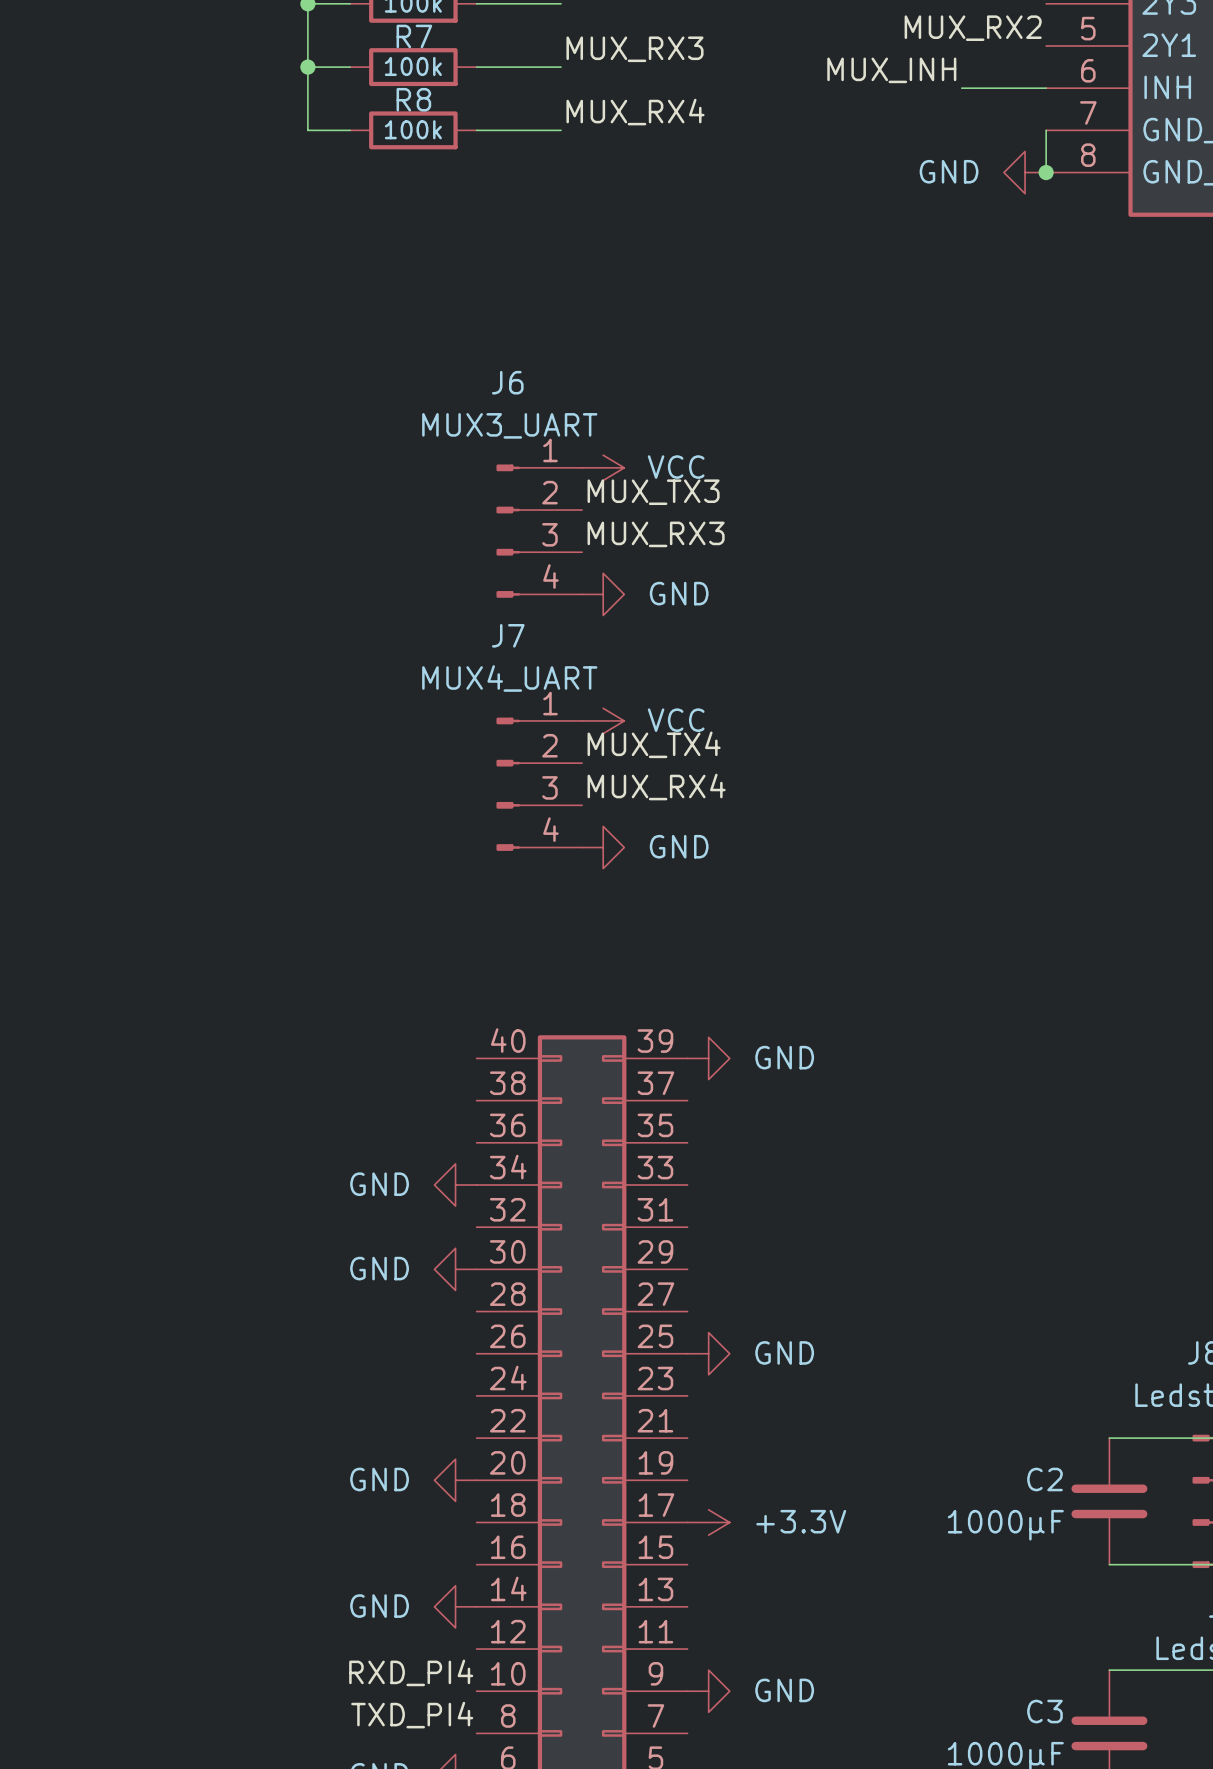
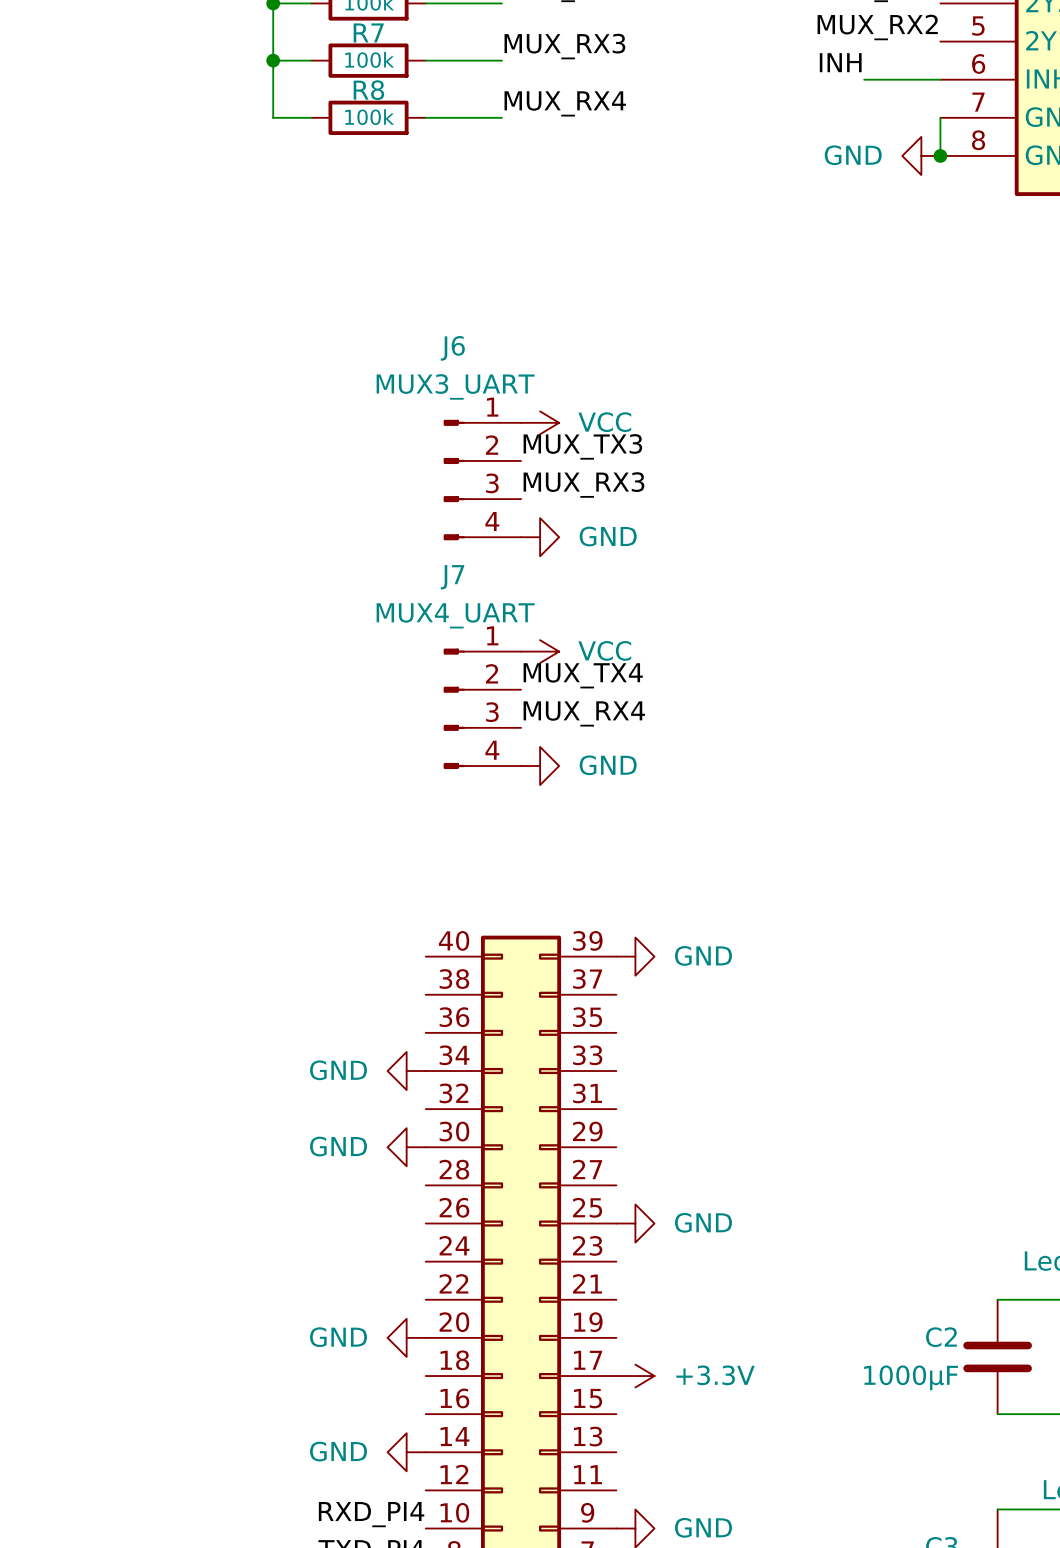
label: MUX_INH (891, 70) -> INH (840, 62)

